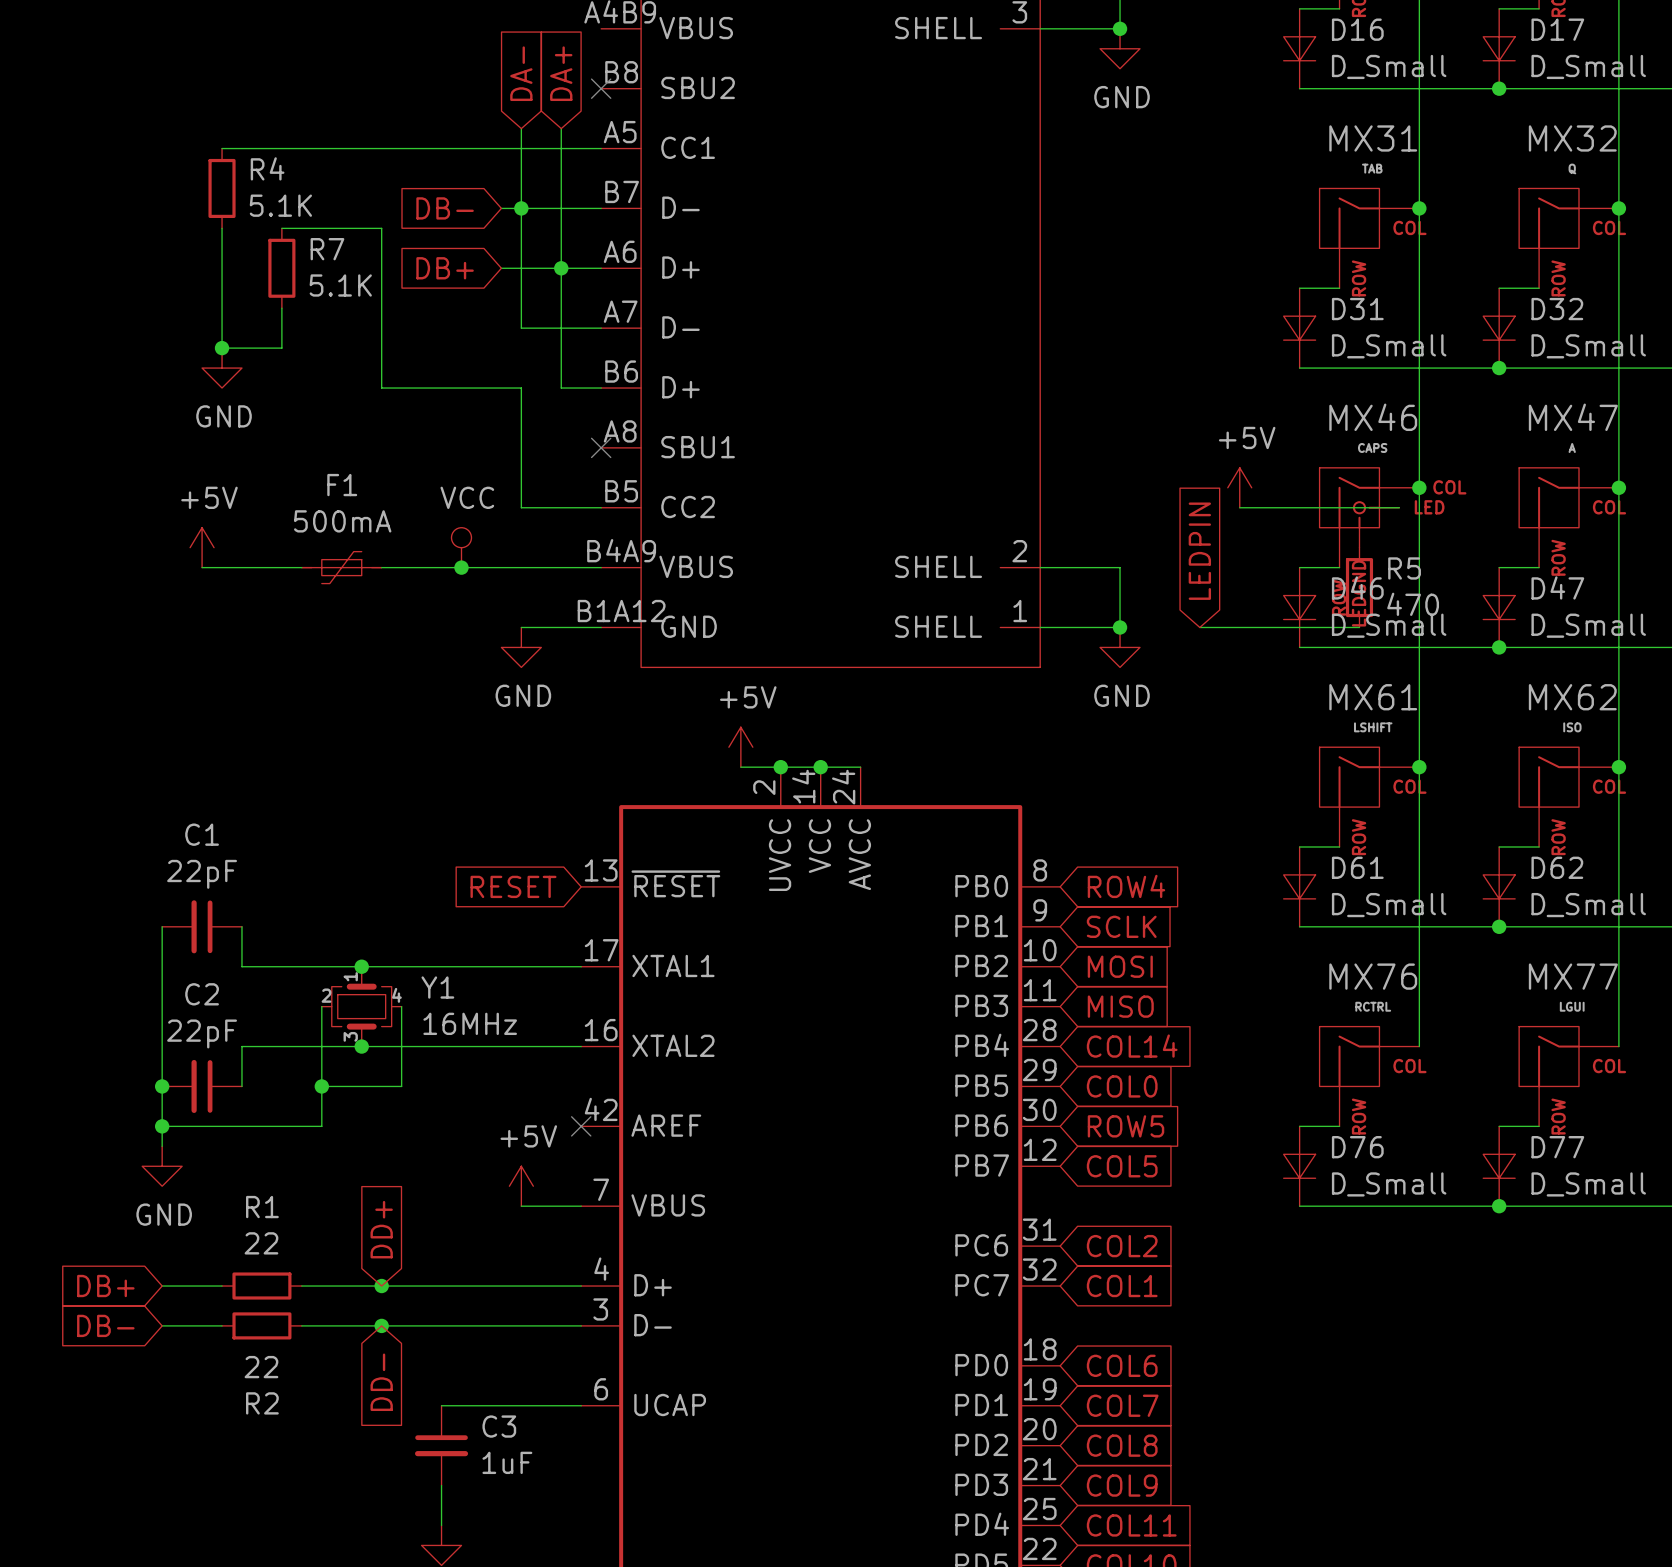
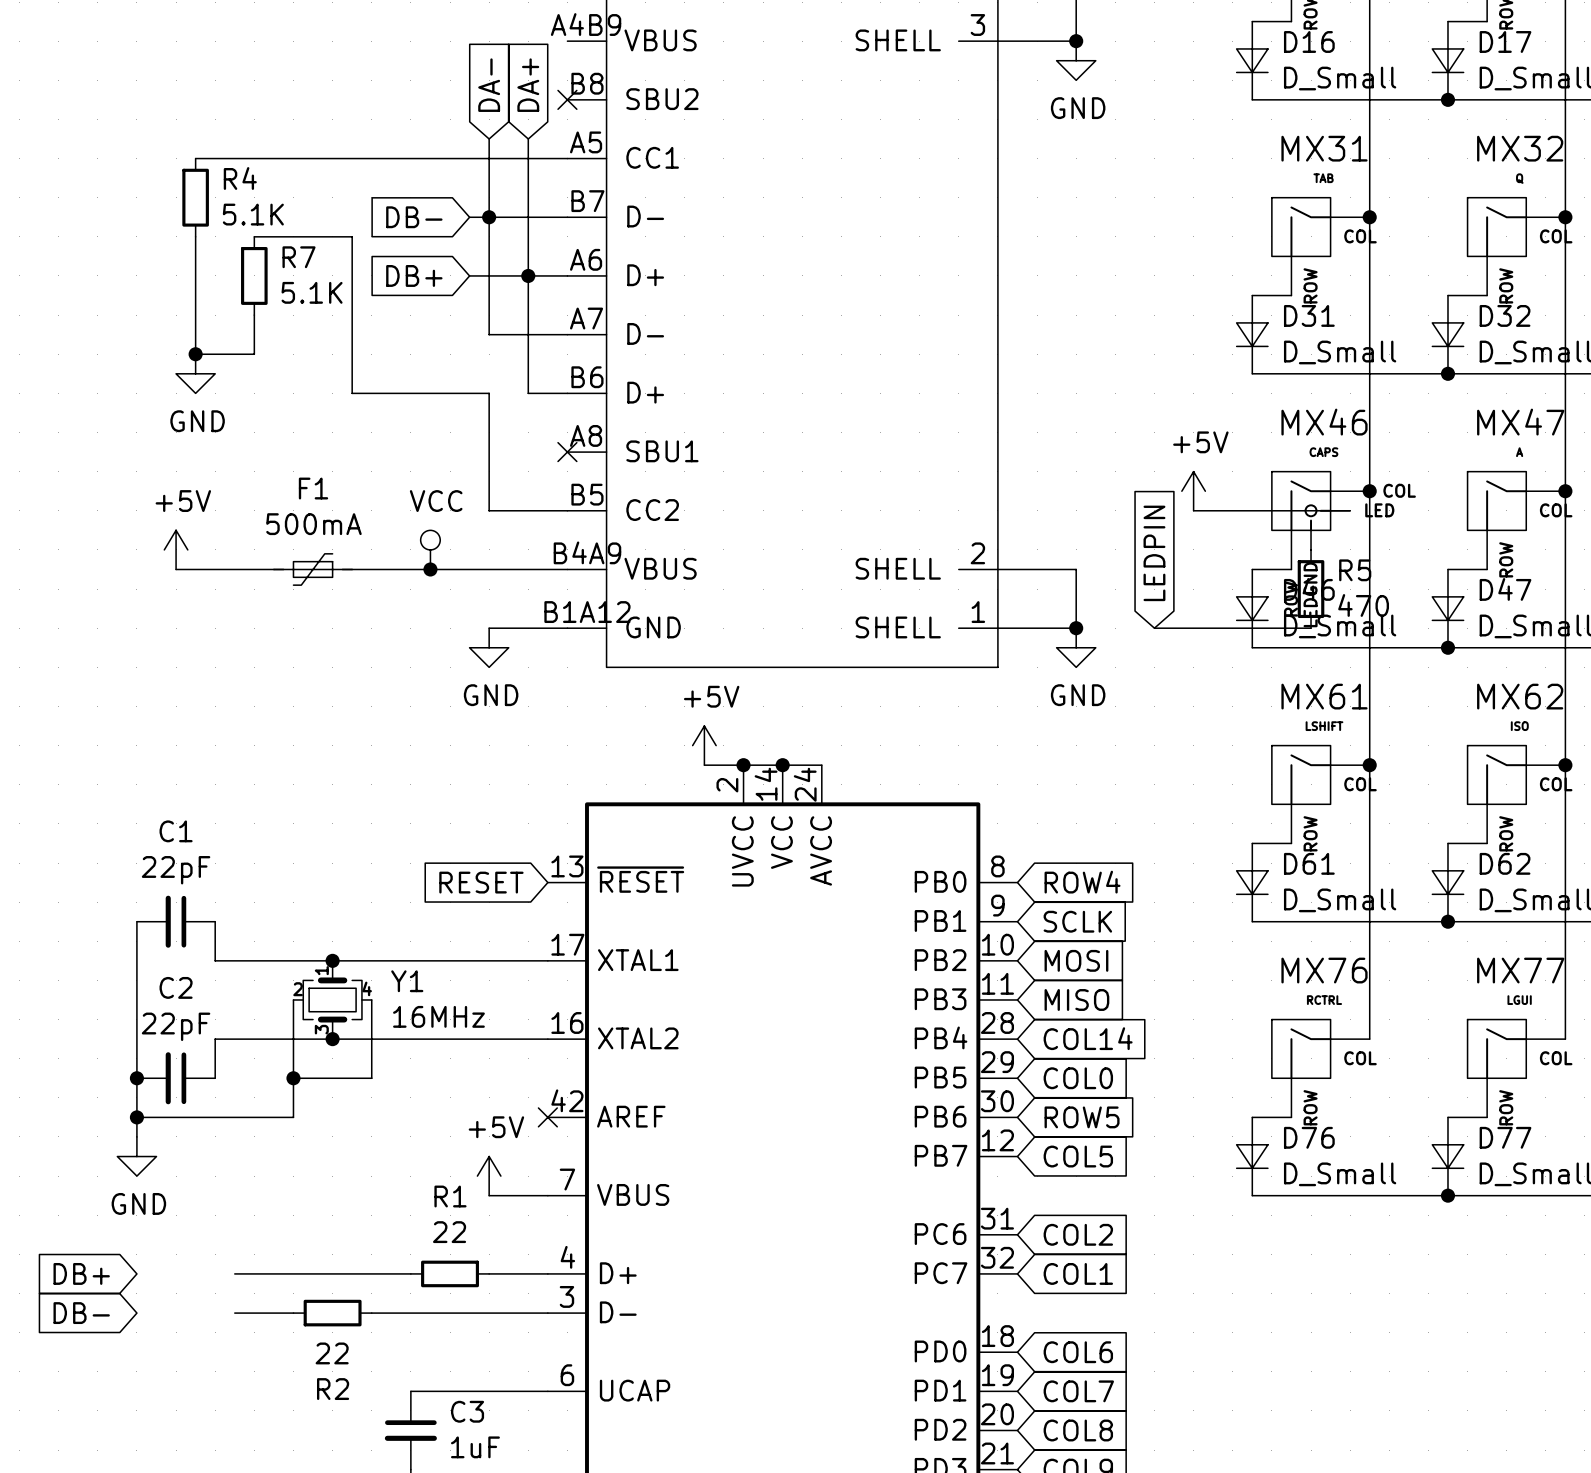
global label: DD+ (381, 1229) -> none
wire: (162, 1286) (222, 1286) -> none
wire: none -> (234, 1273) (273, 1273)
R1 position: (261, 1286) -> (450, 1273)
junction: (381, 1286) -> none
wire: (441, 1286) (521, 1286) -> none
wire: (162, 1325) (222, 1325) -> none
wire: none -> (234, 1313) (273, 1313)
R2 position: (261, 1325) -> (332, 1313)
wire: (321, 1325) (401, 1325) -> none
junction: (381, 1325) -> none
global label: DD- (381, 1382) -> none

